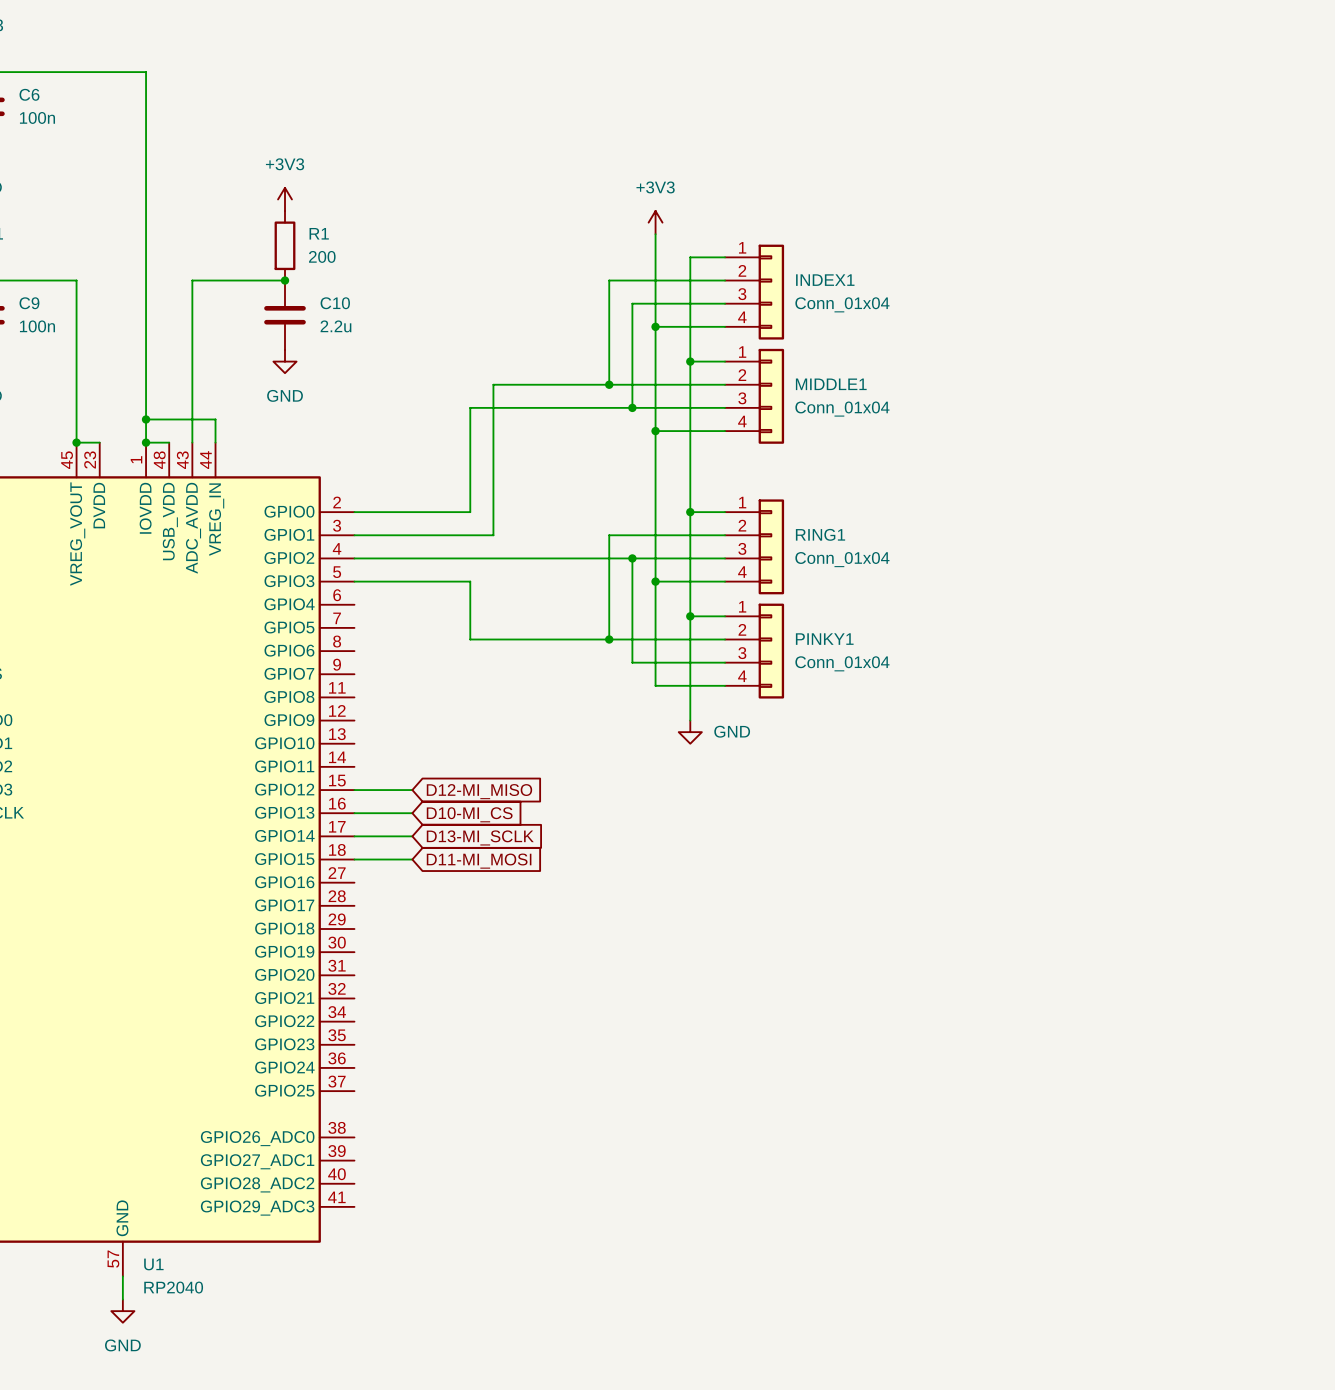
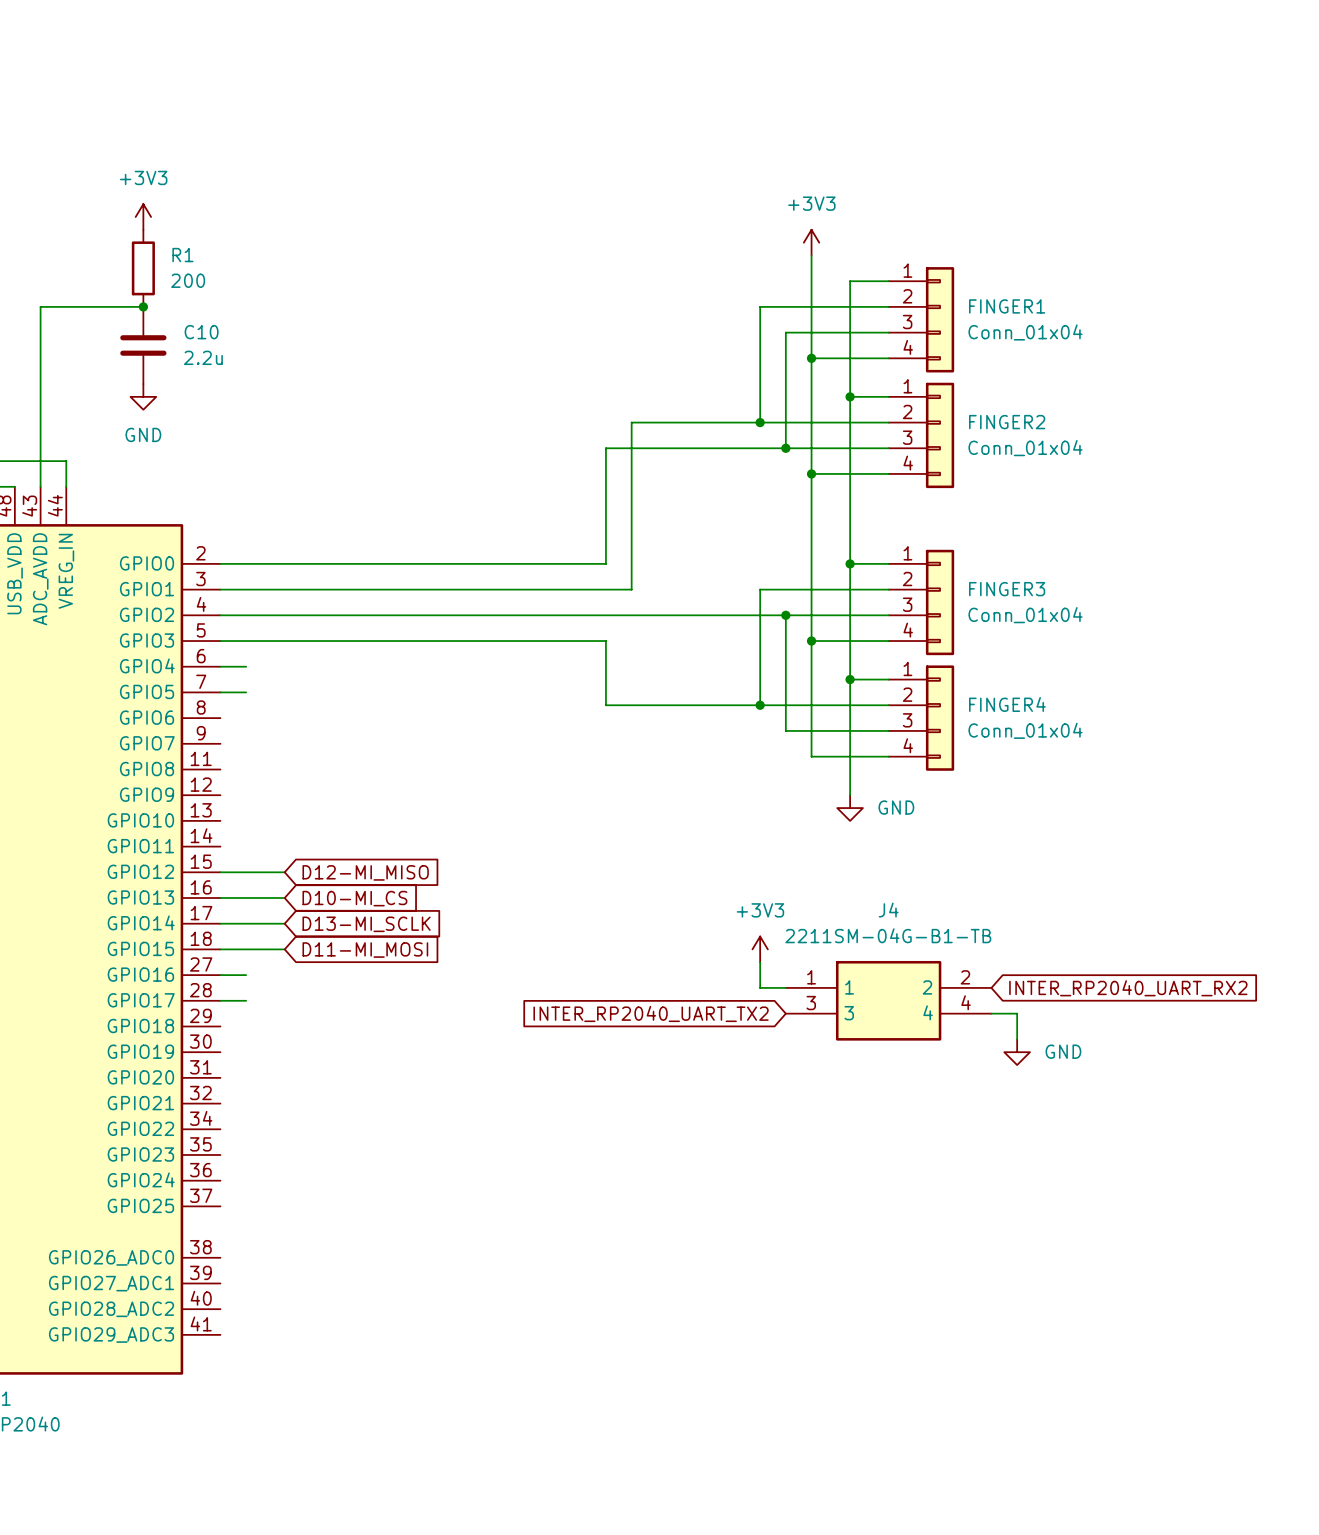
power symbol: +3V3 (655, 222) -> none
power symbol: none -> +3V3 (811, 242)
wire: (655, 234) (655, 685) (725, 685) -> none
wire: none -> (811, 255) (811, 756) (888, 756)
wire: (725, 257) (690, 257) (690, 720) -> none
wire: none -> (888, 281) (850, 281) (850, 795)
wire: (725, 280) (609, 280) (609, 384) -> none
wire: none -> (888, 306) (760, 306) (760, 422)
INDEX1: Conn_01x04 (754, 292) -> none
FINGER1: none -> Conn_01x04 (921, 319)
wire: (725, 303) (632, 303) (632, 407) -> none
wire: none -> (888, 332) (785, 332) (785, 448)
wire: (655, 326) (725, 326) -> none
junction: (655, 326) -> none
wire: none -> (811, 358) (888, 358)
junction: none -> (811, 358)
wire: (690, 361) (725, 361) -> none
junction: (690, 361) -> none
wire: none -> (850, 396) (888, 396)
junction: none -> (850, 396)
junction: (609, 384) -> none
wire: (725, 384) (493, 384) (493, 535) -> none
junction: none -> (760, 422)
wire: none -> (888, 422) (631, 422) (631, 589)
MIDDLE1: Conn_01x04 (754, 396) -> none
FINGER2: none -> Conn_01x04 (921, 435)
junction: (632, 407) -> none
wire: (701, 407) (470, 407) (470, 512) -> (593, 563) (348, 563)
wire: none -> (631, 448) (888, 448)
junction: none -> (785, 448)
wire: (655, 431) (725, 431) -> none
junction: (655, 431) -> none
wire: none -> (811, 473) (888, 473)
junction: none -> (811, 473)
junction: (690, 512) -> none
wire: (701, 512) (725, 512) -> (605, 563) (605, 448)
wire: none -> (850, 563) (888, 563)
junction: none -> (850, 563)
wire: (609, 535) (609, 639) -> (503, 589) (374, 589)
wire: none -> (888, 589) (760, 589) (760, 705)
RING1: Conn_01x04 (754, 546) -> none
FINGER3: none -> Conn_01x04 (921, 602)
wire: (632, 558) (632, 662) (725, 662) -> none
junction: (632, 558) -> none
wire: none -> (631, 615) (888, 615)
wire: none -> (785, 615) (785, 730) (888, 730)
junction: none -> (785, 615)
wire: (470, 581) (470, 639) (701, 639) -> (348, 641) (554, 641)
junction: (655, 581) -> none
wire: (701, 581) (725, 581) -> (605, 641) (605, 705)
wire: none -> (811, 641) (888, 641)
junction: none -> (811, 641)
wire: none -> (220, 666) (246, 666)
wire: (690, 616) (725, 616) -> none
junction: (690, 616) -> none
wire: none -> (850, 679) (888, 679)
junction: none -> (850, 679)
wire: none -> (220, 692) (246, 692)
junction: (609, 639) -> none
wire: none -> (631, 705) (888, 705)
junction: none -> (760, 705)
PINKY1: Conn_01x04 (754, 651) -> none
FINGER4: none -> Conn_01x04 (921, 718)
power symbol: GND (690, 732) -> none
power symbol: none -> GND (850, 808)
power symbol: none -> +3V3 (760, 949)
wire: none -> (760, 962) (760, 987) (785, 987)
wire: none -> (220, 975) (246, 975)
global label: none -> INTER_RP2040_UART_RX2 (1128, 988)
wire: none -> (220, 1000) (246, 1000)
J4: none -> 2211SM-04G-B1-TB (888, 1000)
wire: none -> (991, 1013) (1017, 1013) (1017, 1039)
global label: none -> INTER_RP2040_UART_TX2 (651, 1013)
power symbol: none -> GND (1017, 1052)

